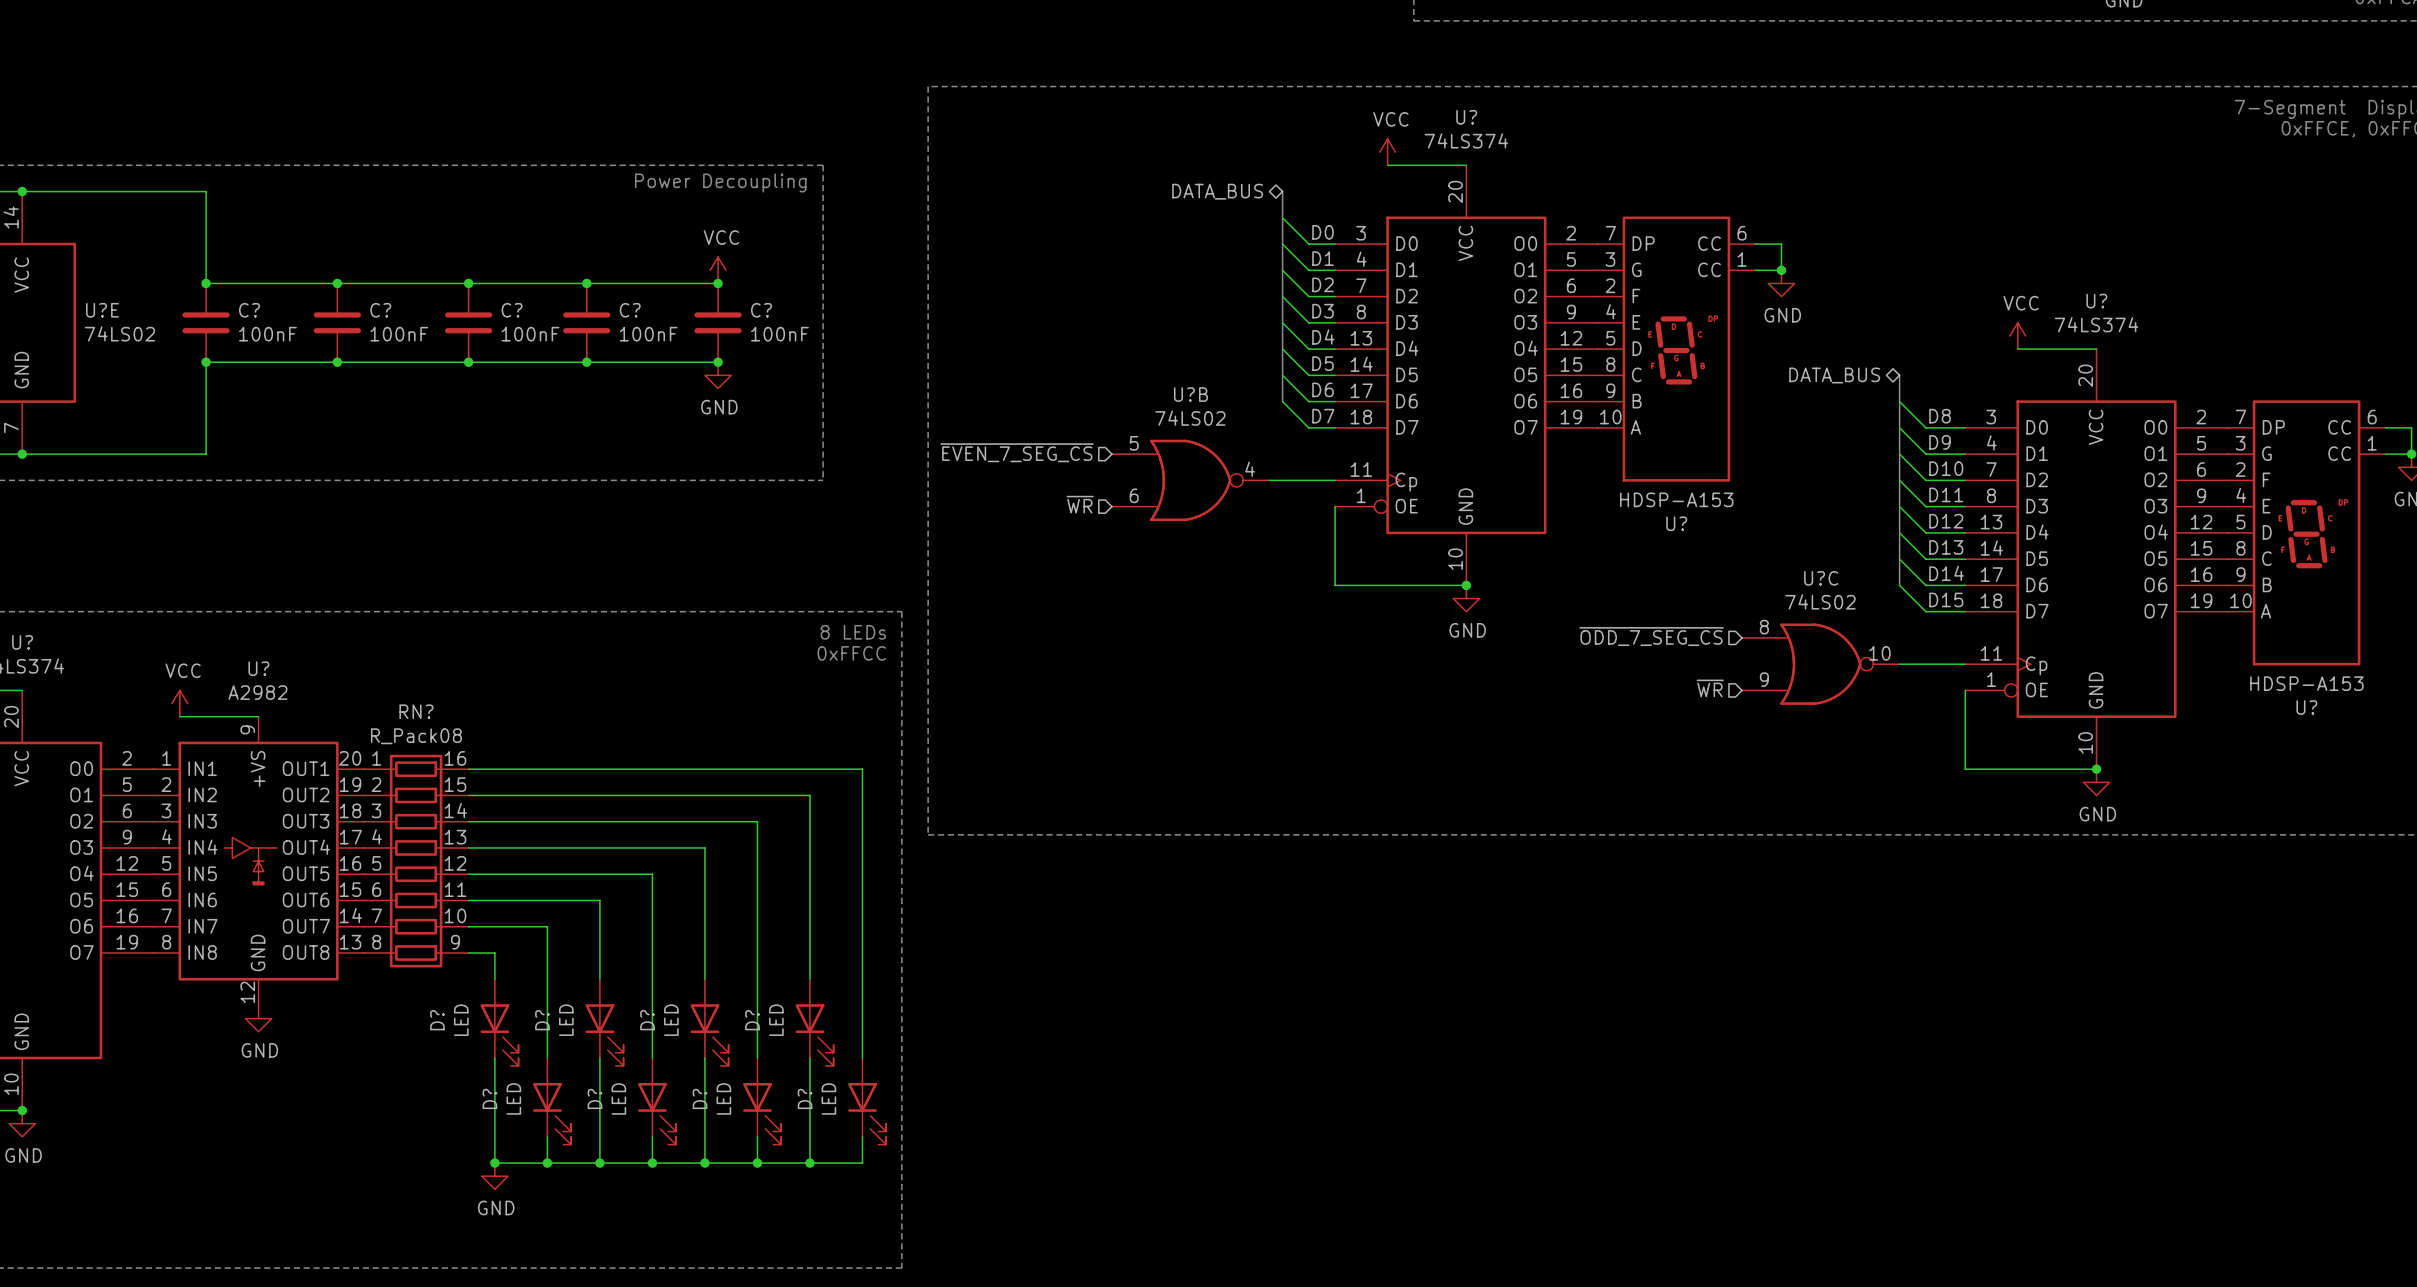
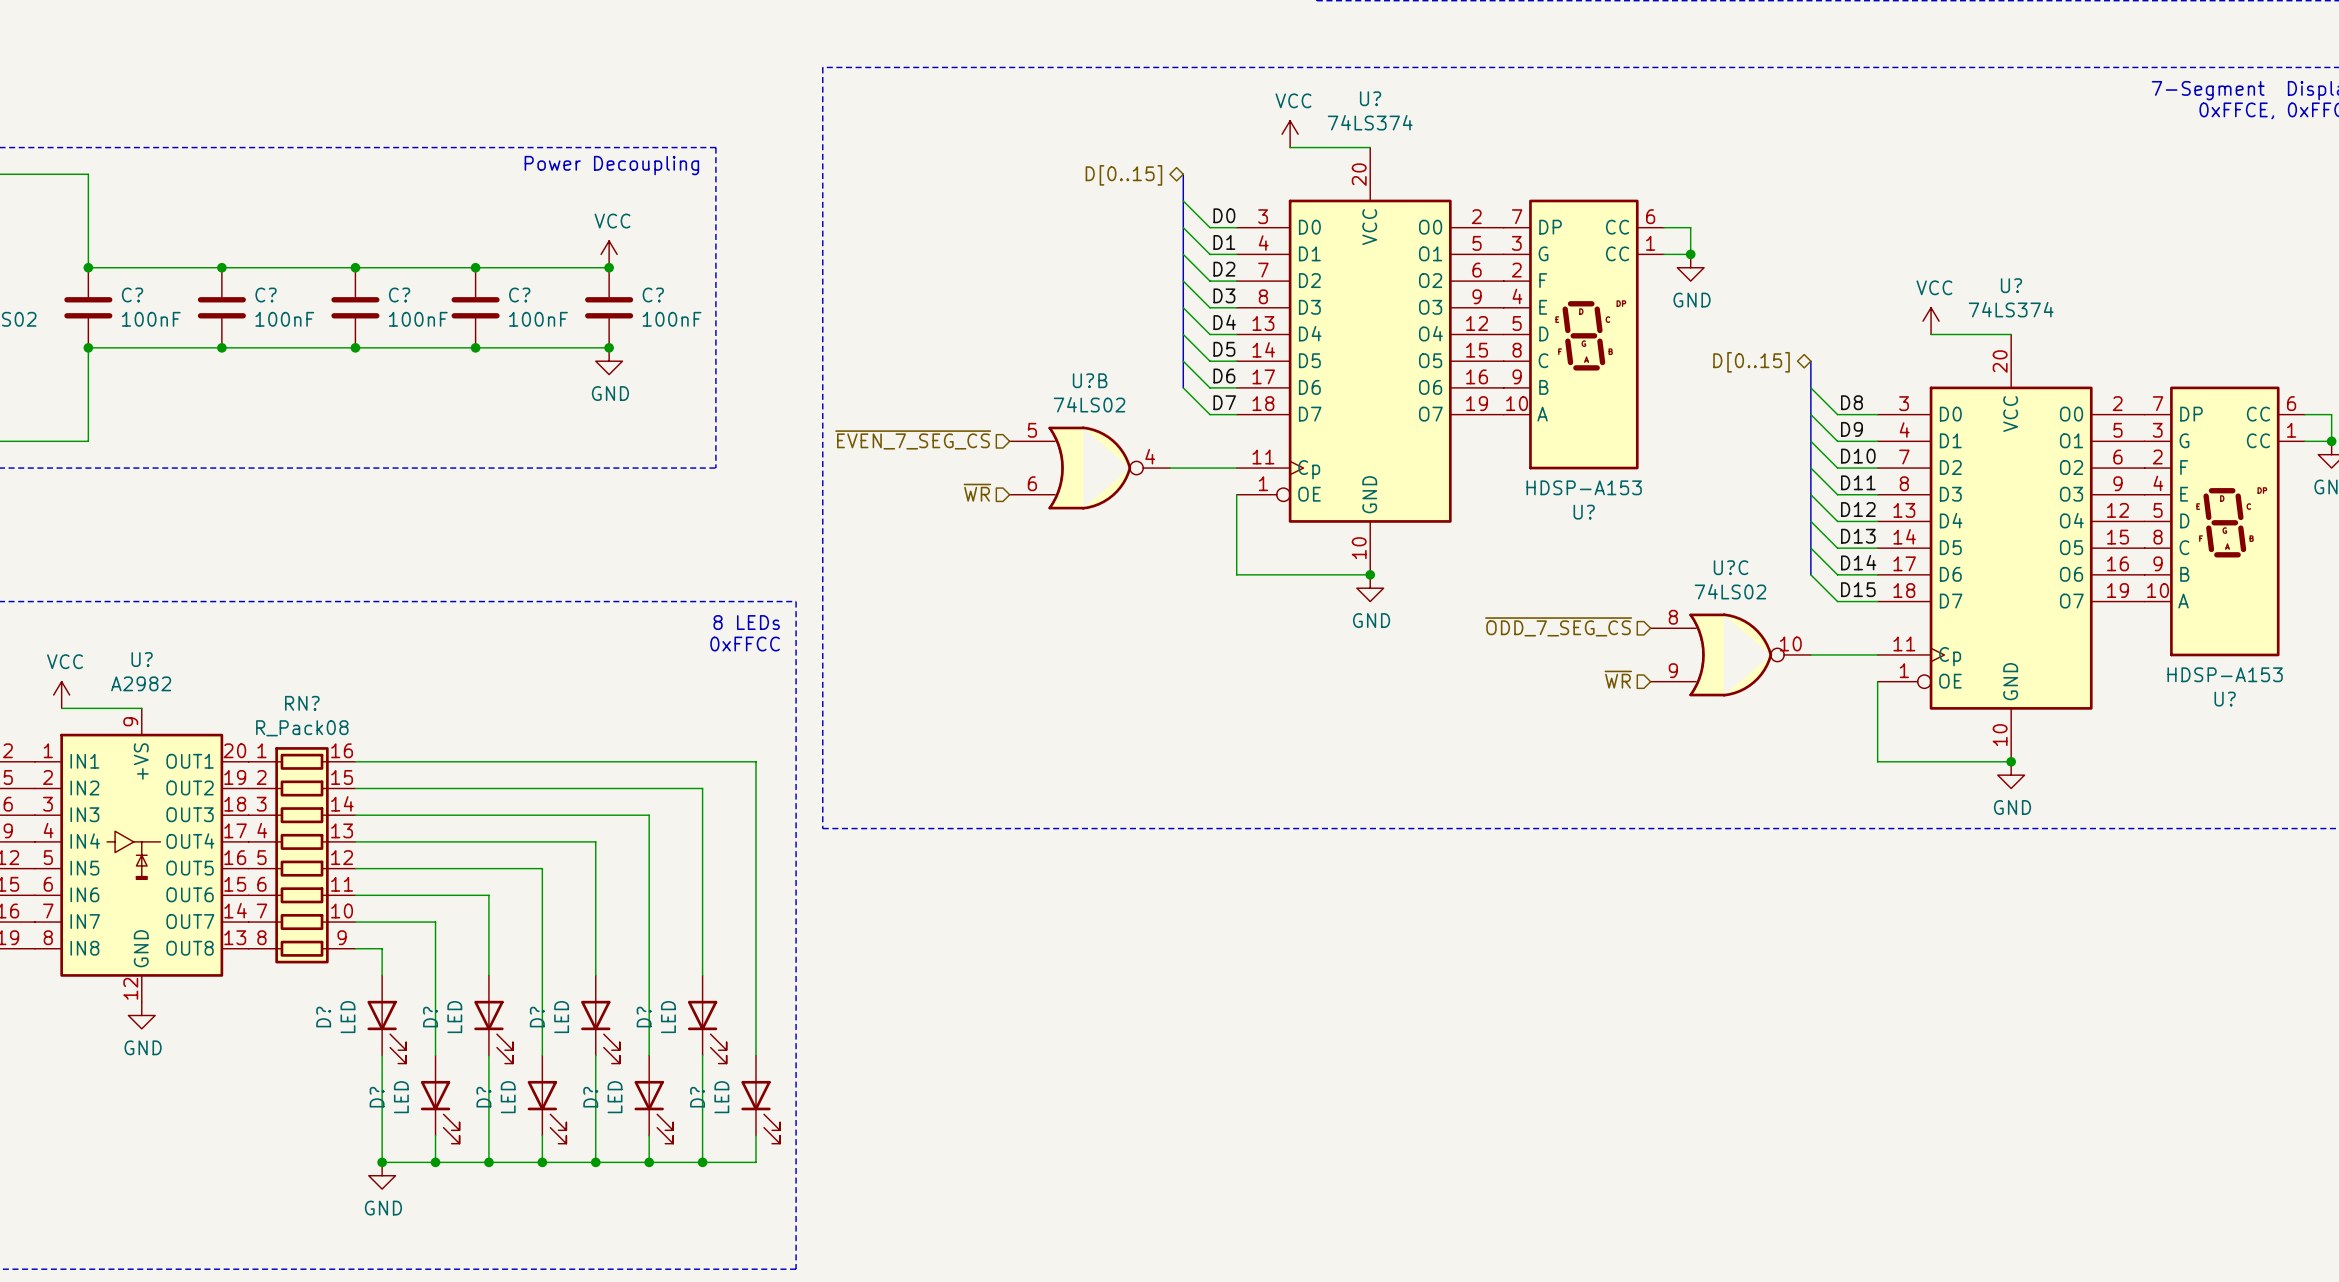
hierarchical label: DATA_BUS (1217, 191) -> D[0..15] (1123, 175)
hierarchical label: DATA_BUS (1834, 375) -> D[0..15] (1751, 362)

